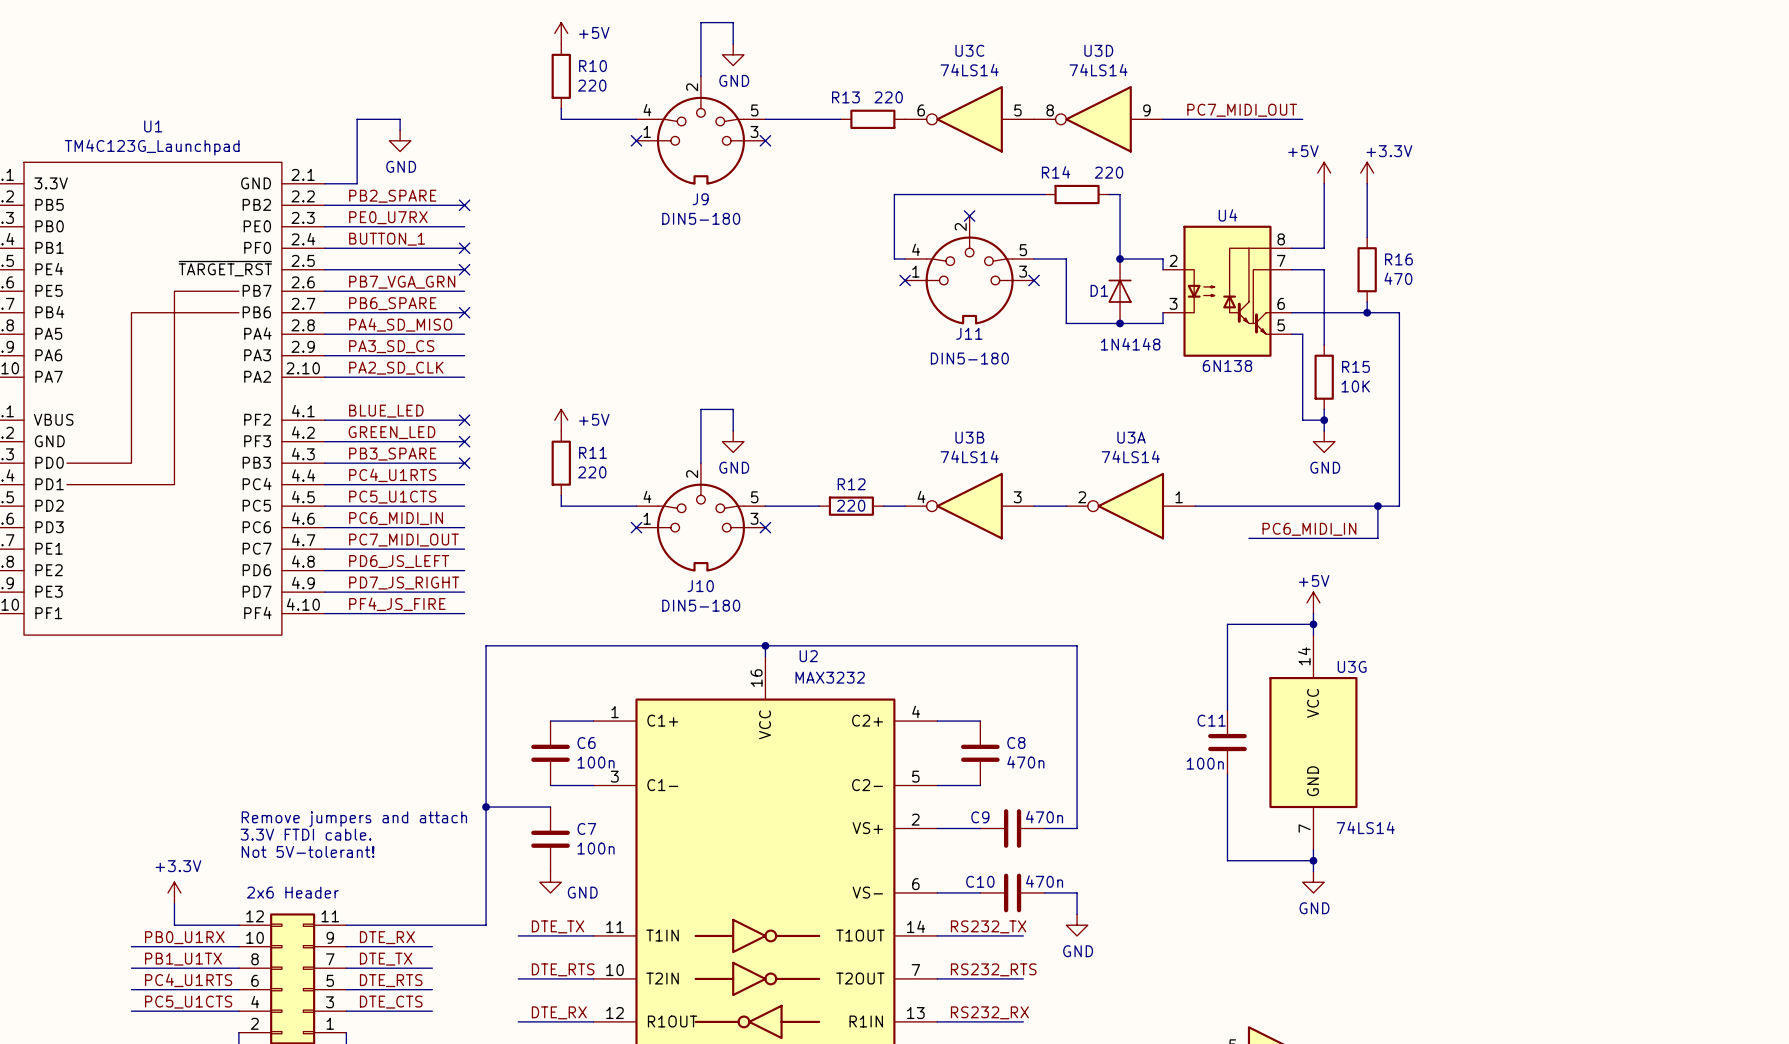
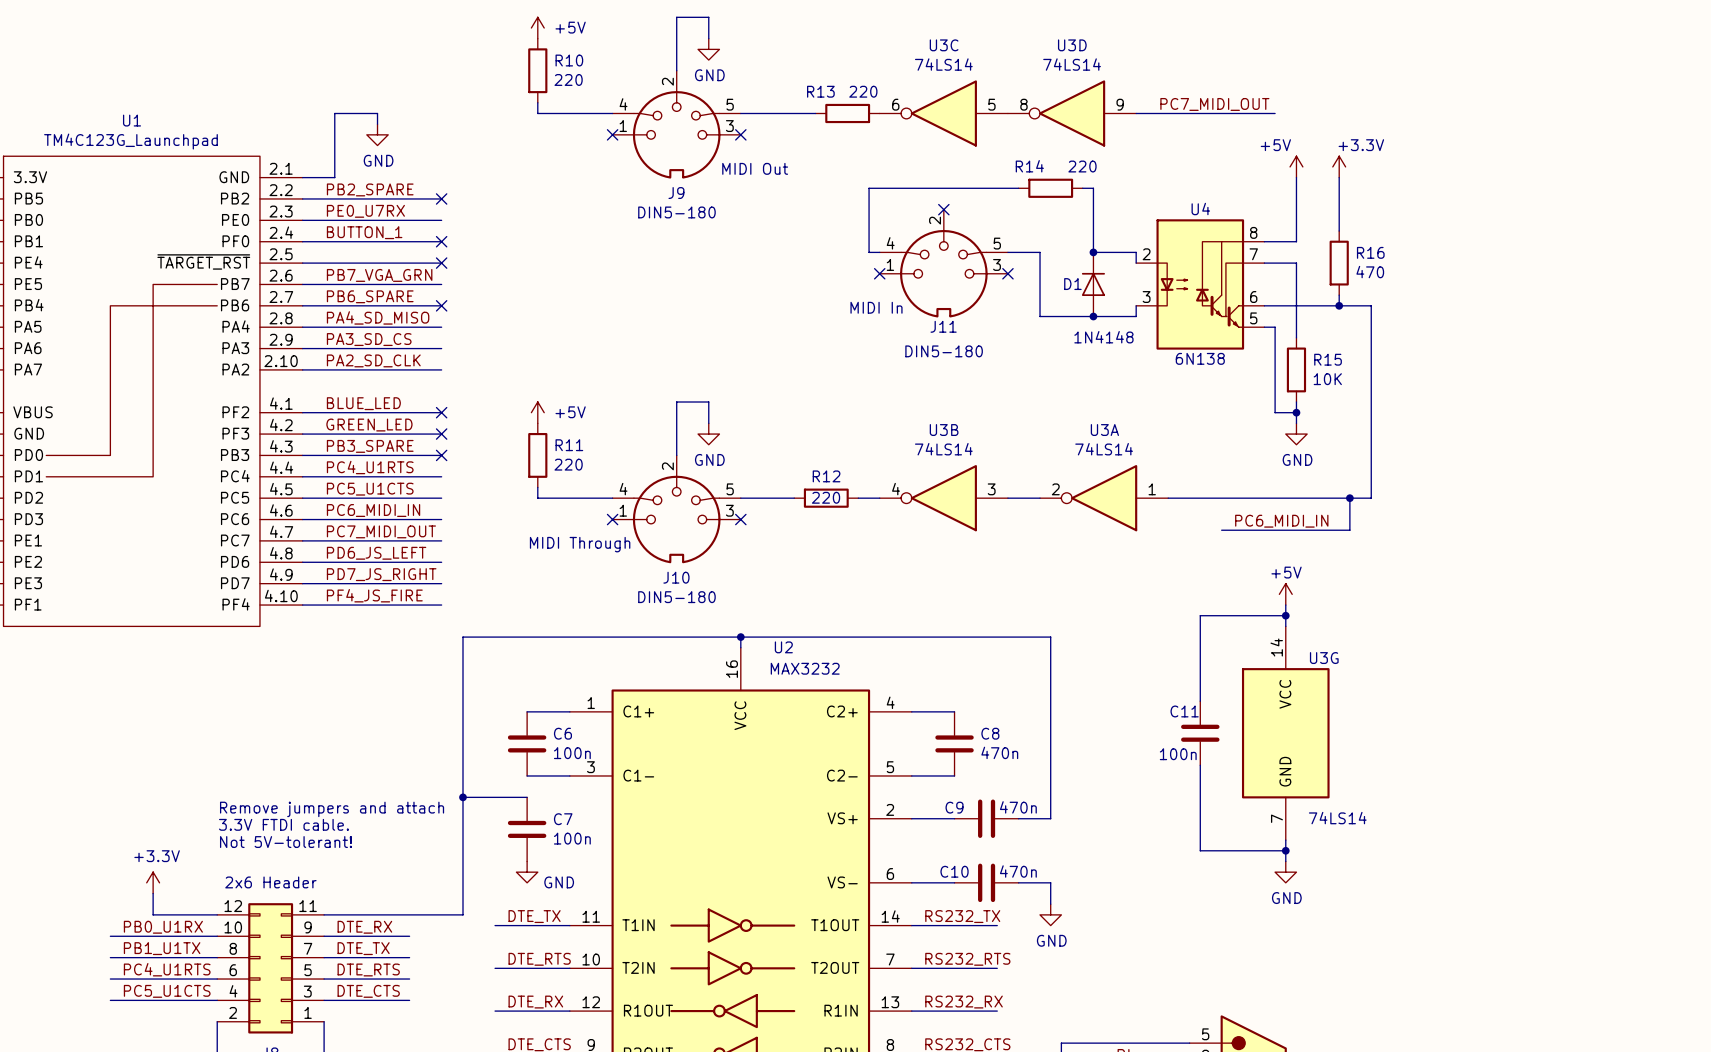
text: none -> MIDI Out (755, 168)
text: none -> MIDI In (876, 307)
text: none -> MIDI Through (580, 544)

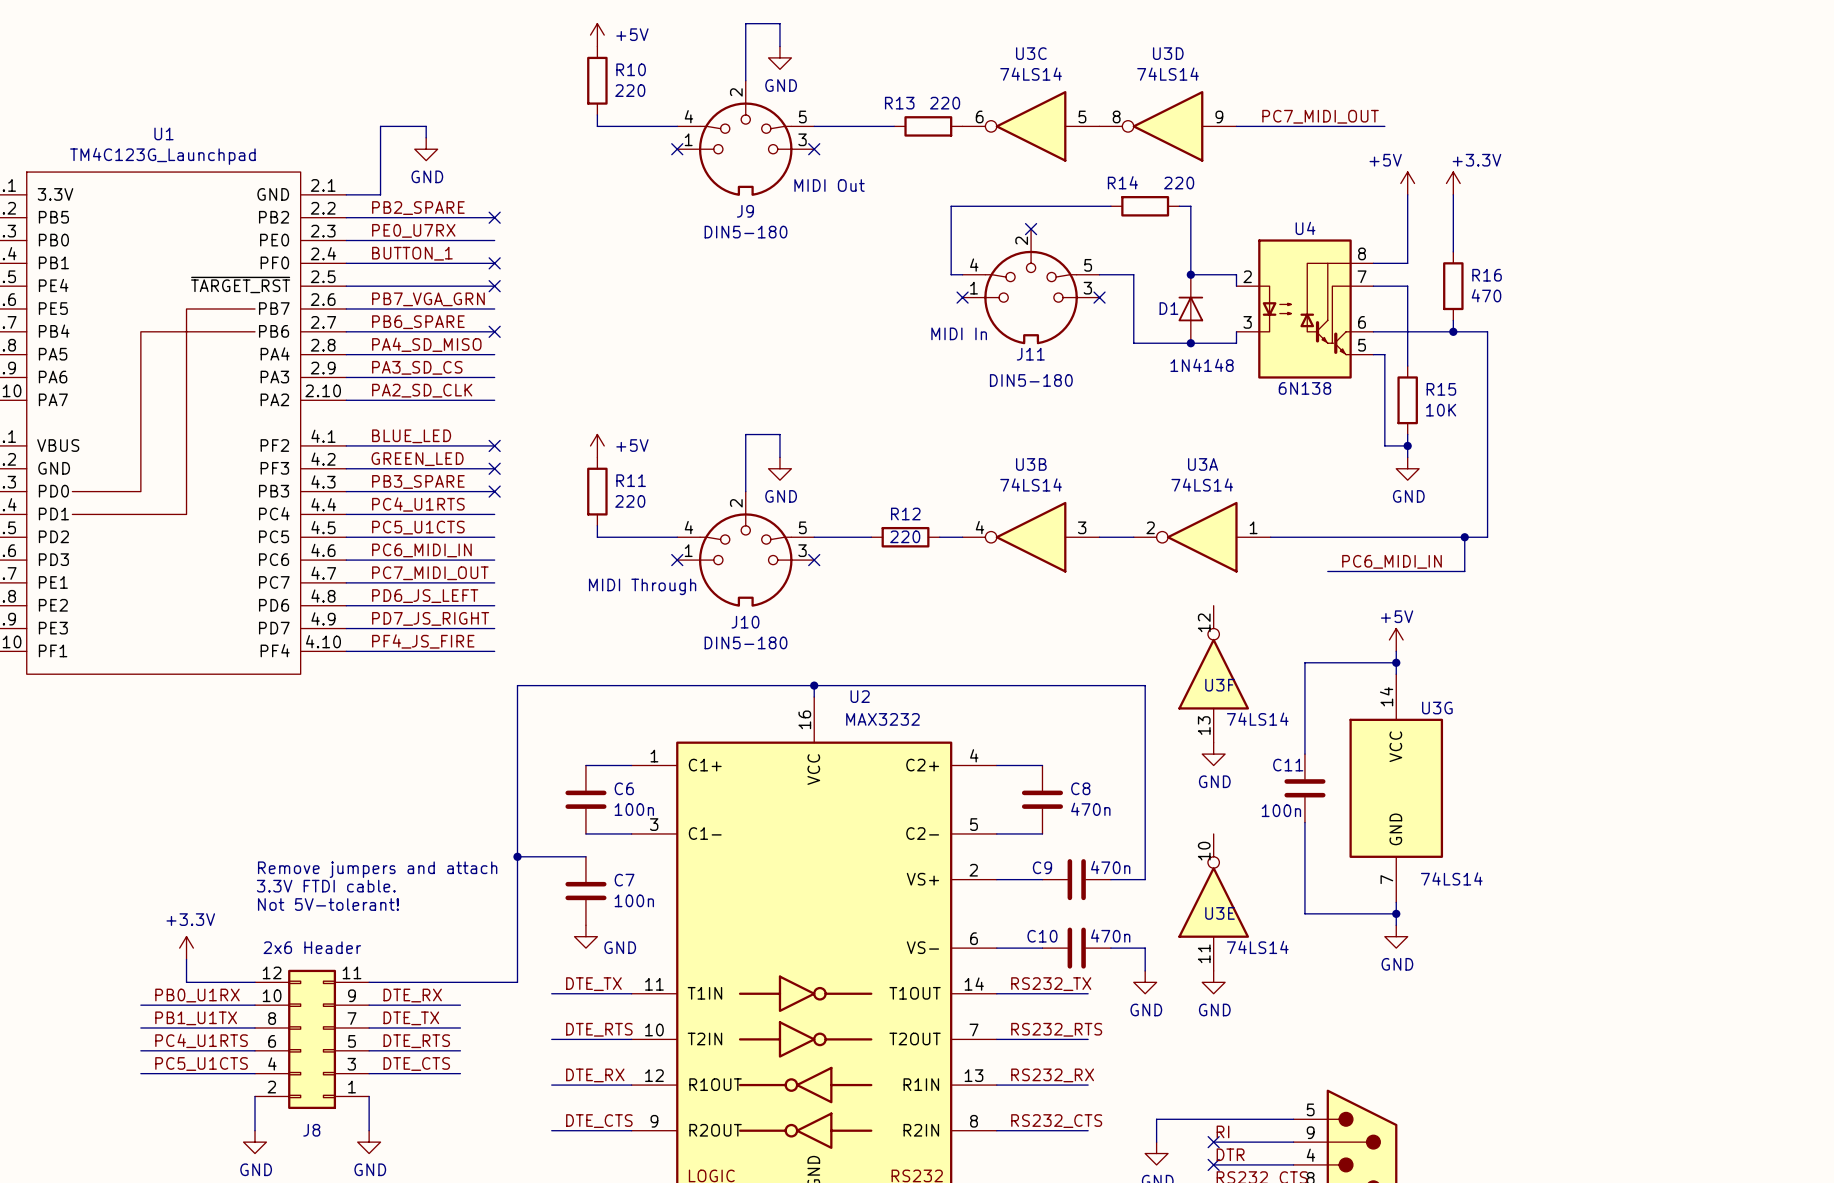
U3F: none -> 74LS14 (1213, 674)
power symbol: none -> GND (1213, 754)
U3E: none -> 74LS14 (1213, 902)
power symbol: none -> GND (1213, 982)

